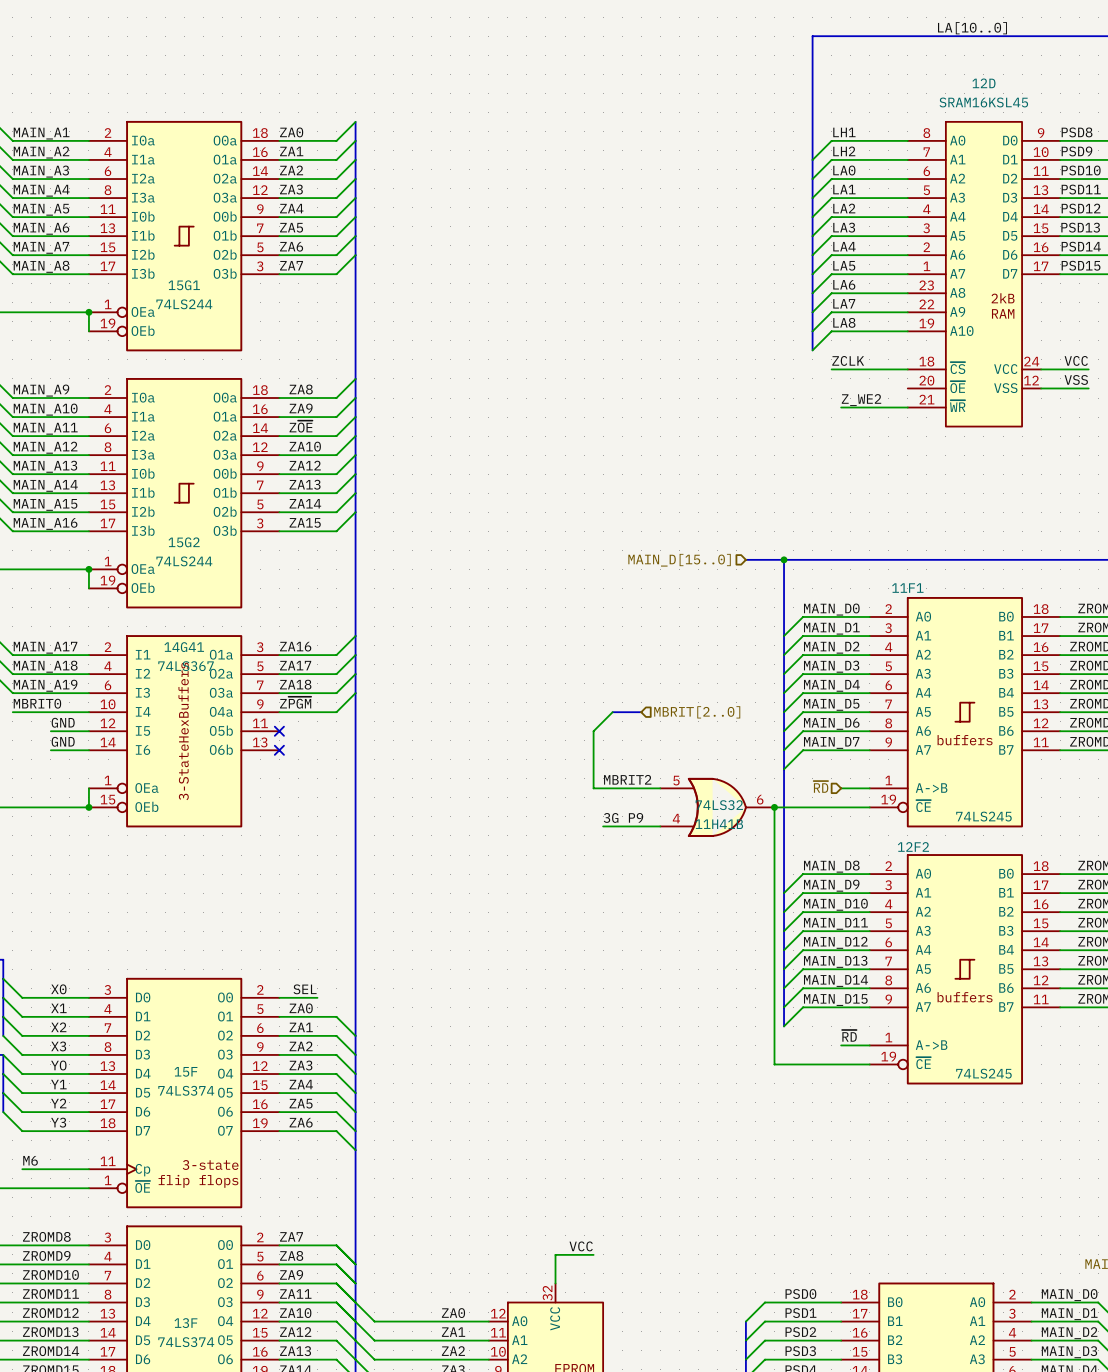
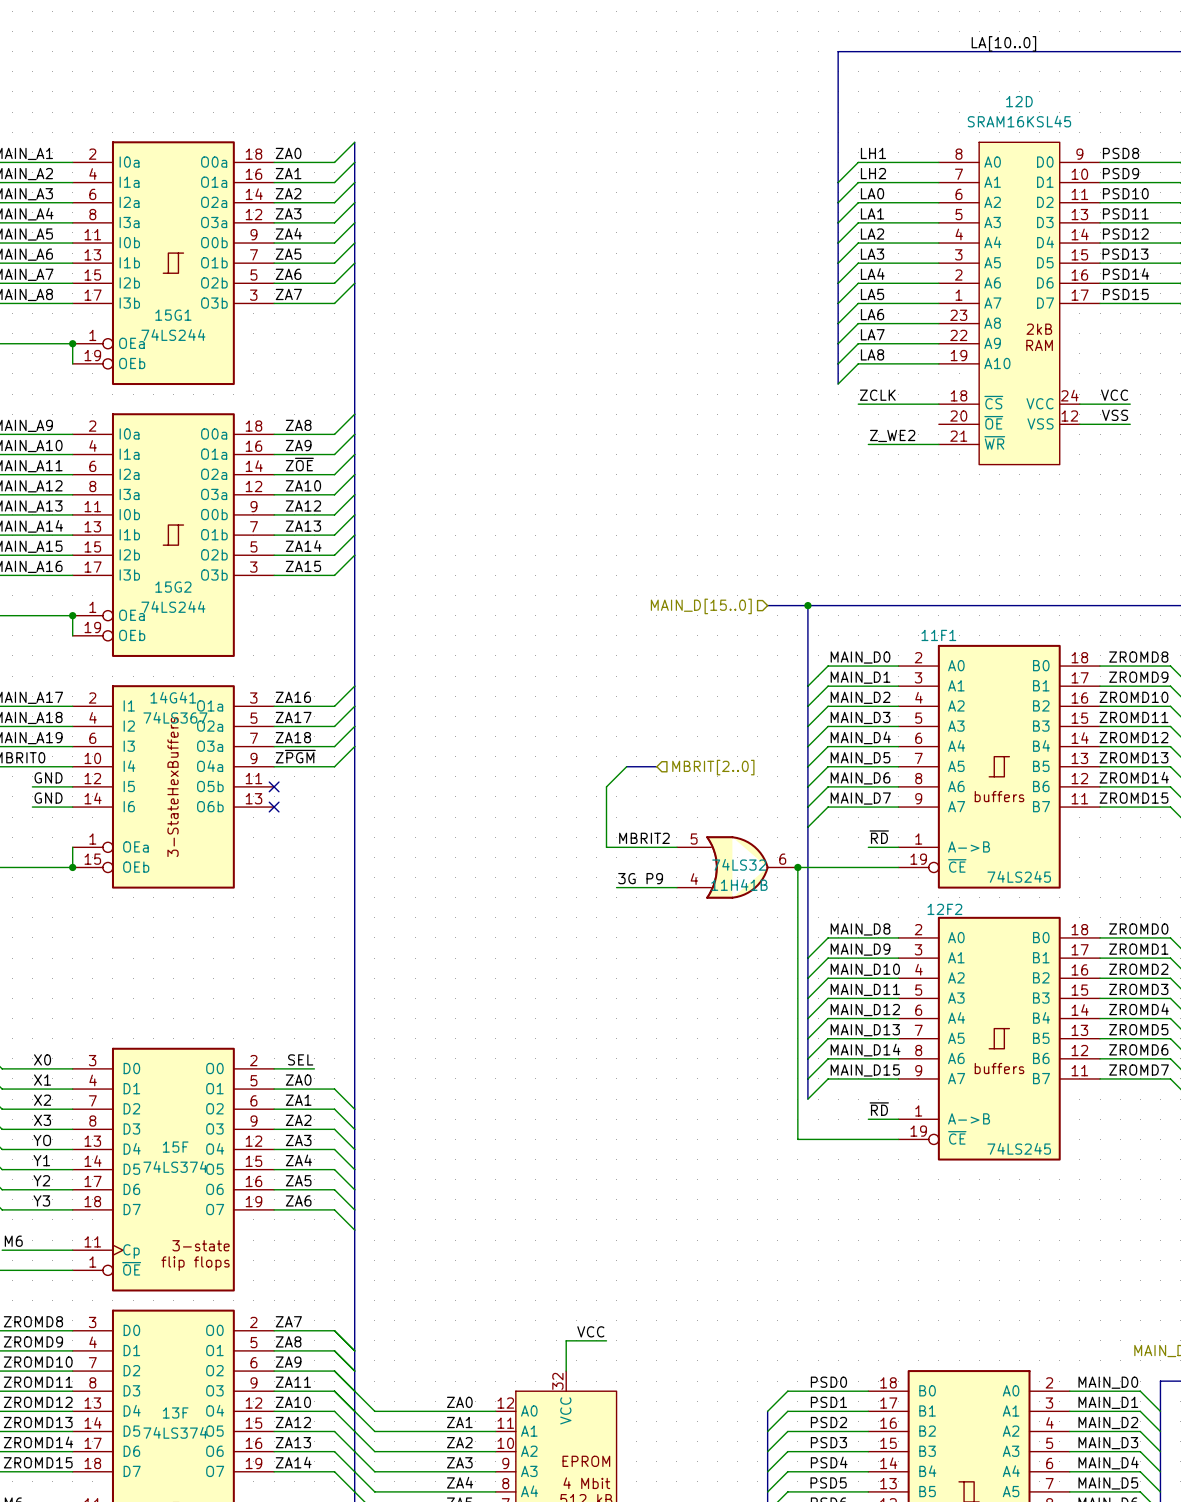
label: none -> ~{RD} (879, 837)
hierarchical label: ~{RD} (820, 786) -> none

